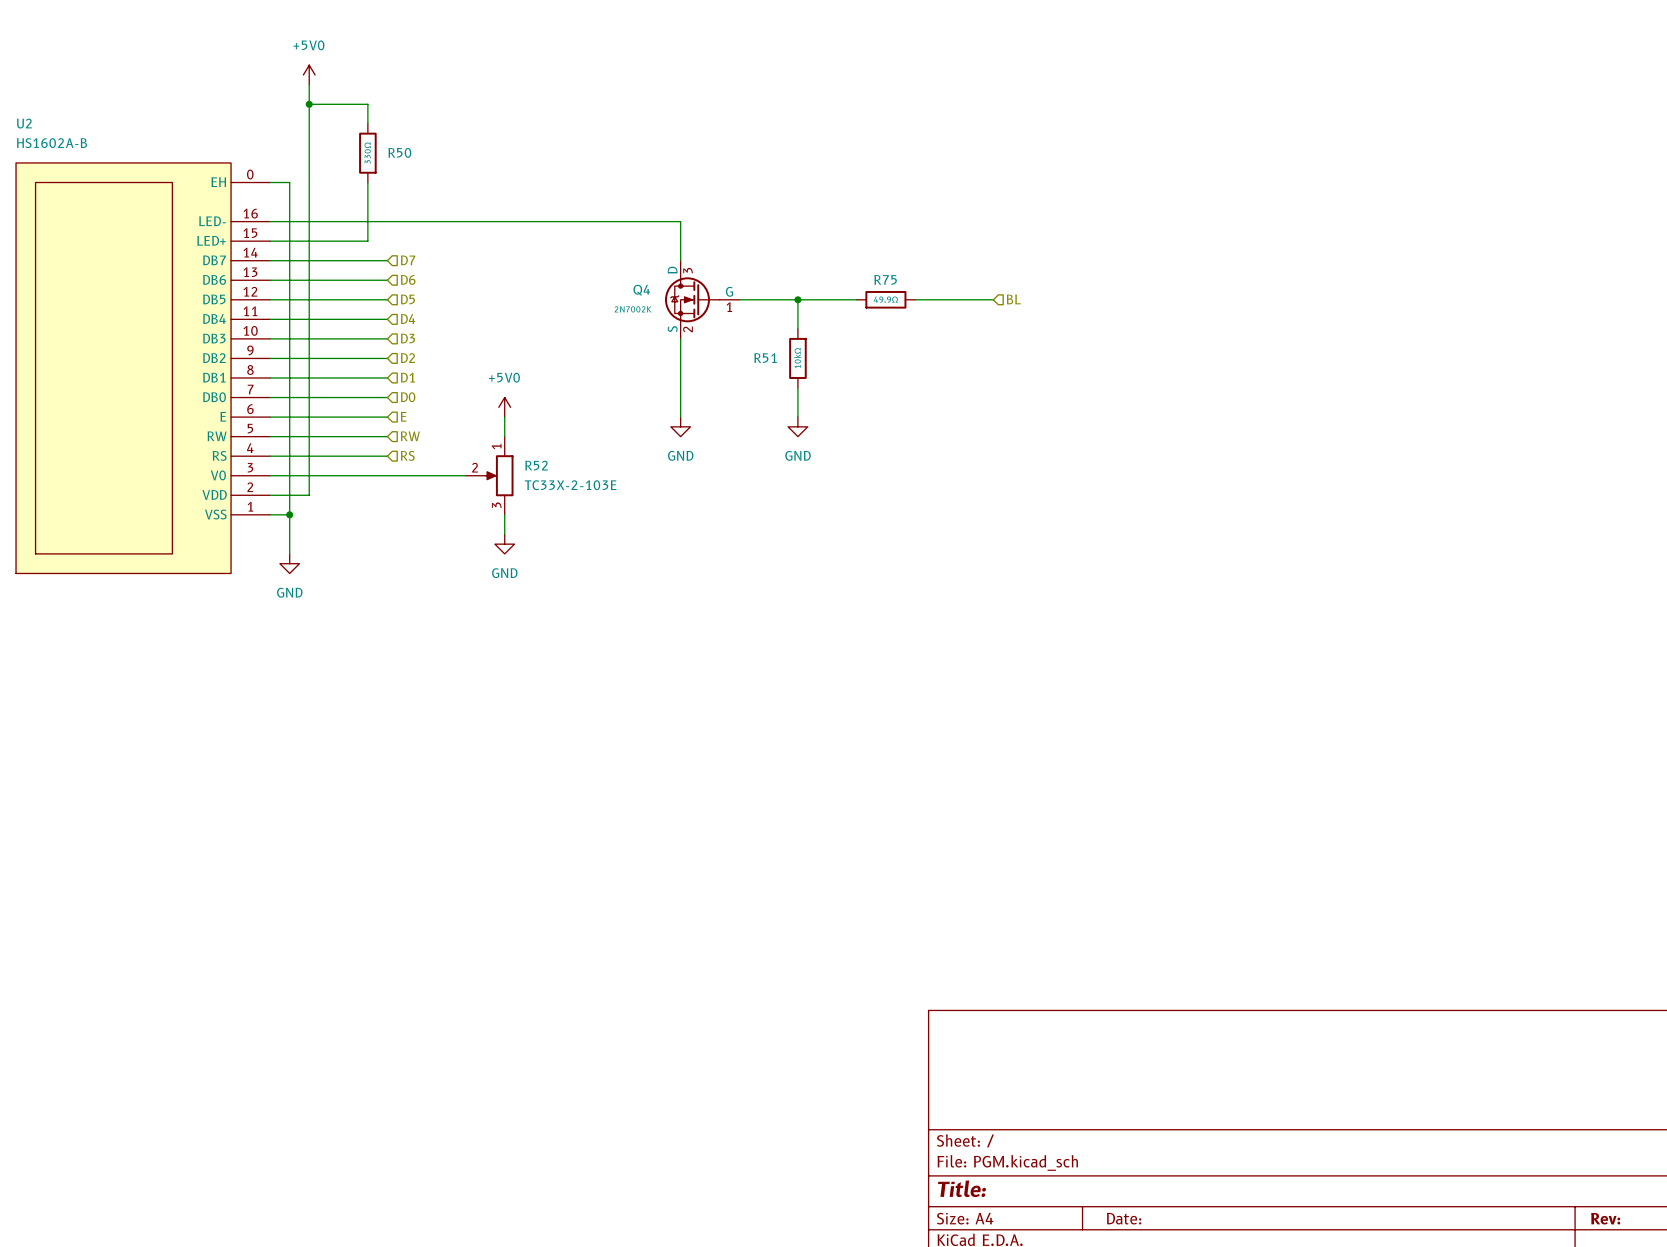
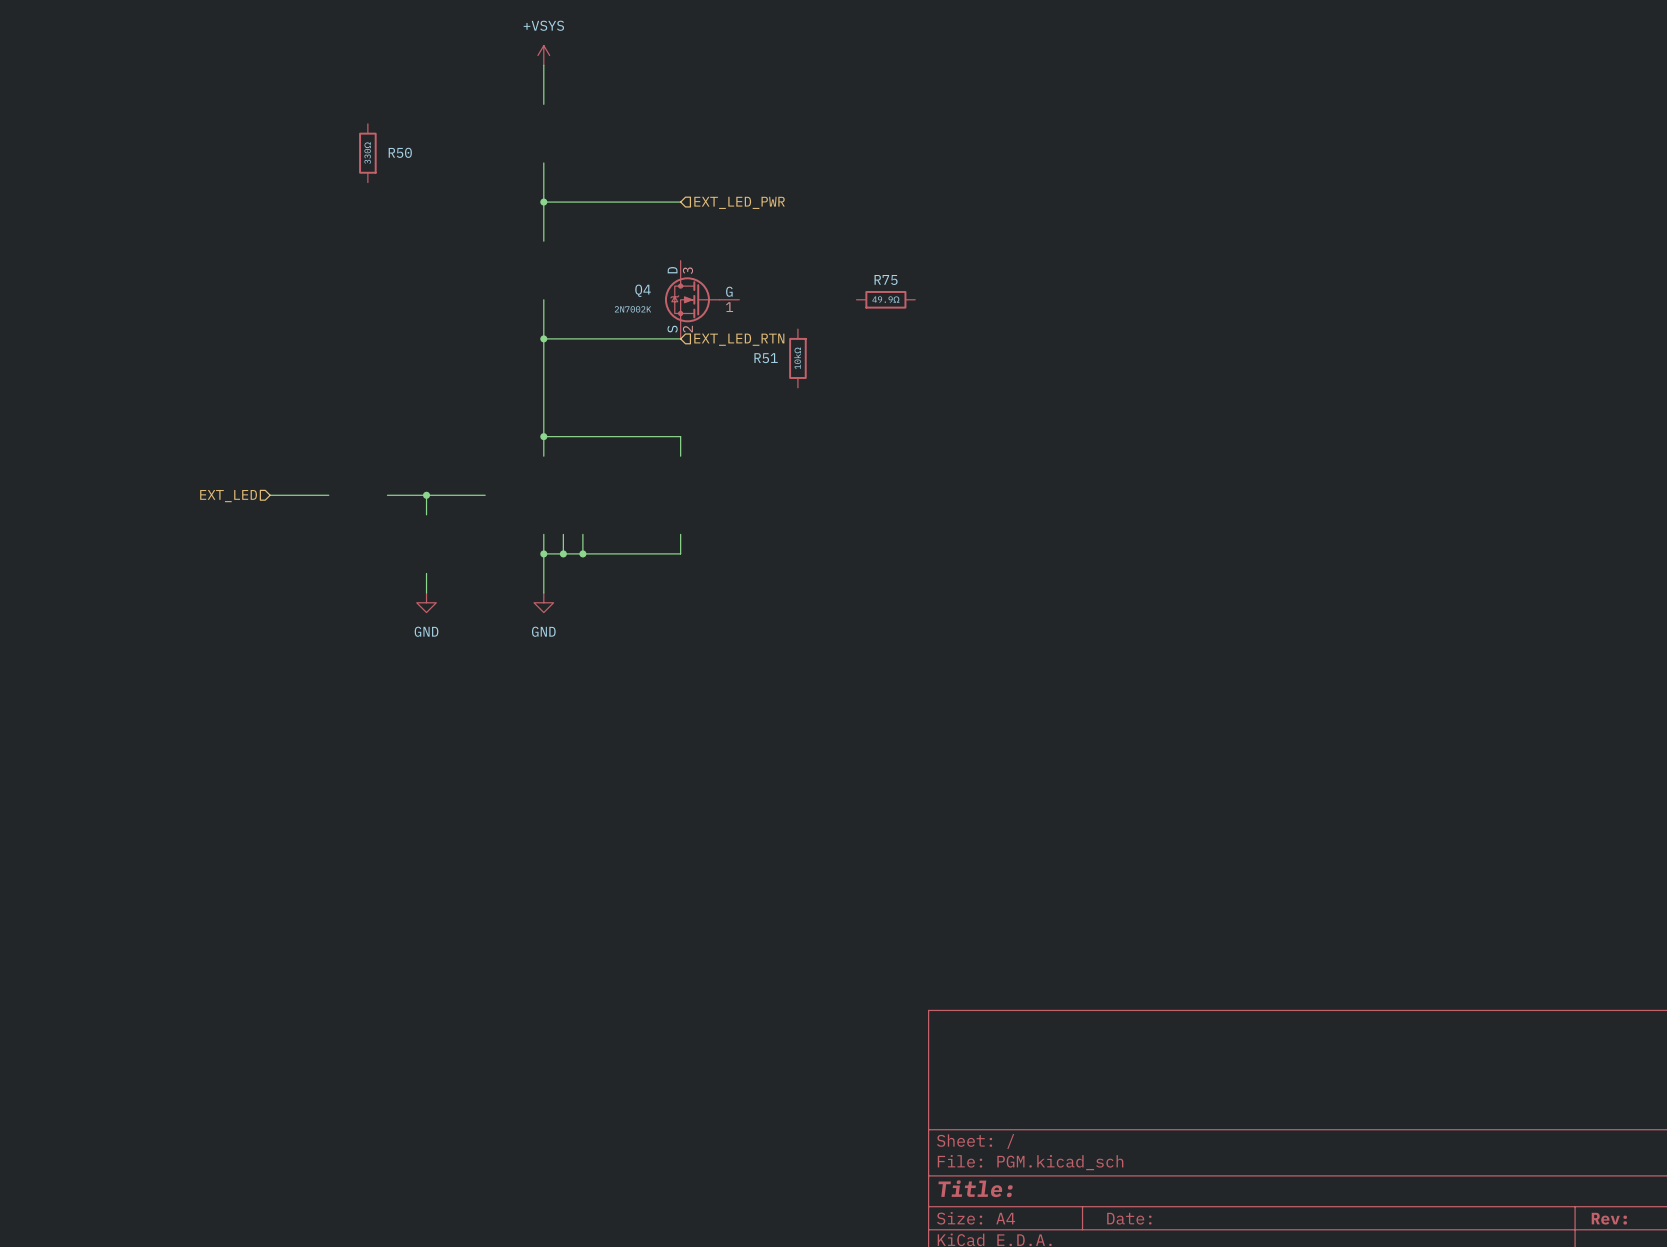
power symbol: none -> +VSYS (543, 55)
wire: none -> (543, 65) (543, 104)
power symbol: +5V0 (309, 75) -> none
wire: (309, 84) (309, 495) -> (328, 495) (309, 495)
wire: (309, 104) (367, 104) (367, 123) -> none
junction: (309, 104) -> none
wire: none -> (543, 162) (543, 241)
wire: (270, 182) (289, 182) (289, 553) -> none
wire: (367, 182) (367, 241) (270, 241) -> none
wire: none -> (543, 202) (680, 202)
junction: none -> (543, 202)
hierarchical label: none -> EXT_LED_PWR (739, 202)
wire: (270, 221) (680, 221) (680, 260) -> none
wire: (270, 260) (387, 260) -> none
hierarchical label: D7 (408, 260) -> none
hierarchical label: D6 (408, 279) -> none
wire: (270, 280) (387, 280) -> none
wire: (270, 299) (387, 299) -> none
hierarchical label: D5 (407, 299) -> none
wire: none -> (543, 299) (543, 456)
wire: (739, 299) (856, 299) -> none
wire: (797, 299) (797, 329) -> none
junction: (797, 299) -> none
wire: (915, 299) (993, 299) -> none
hierarchical label: BL (1013, 299) -> none
hierarchical label: D4 (408, 318) -> none
wire: (270, 319) (387, 319) -> none
wire: (270, 338) (387, 338) -> none
hierarchical label: D3 (407, 338) -> none
junction: none -> (543, 338)
wire: (680, 338) (680, 417) -> (680, 338) (543, 338)
hierarchical label: none -> EXT_LED_RTN (739, 339)
wire: (270, 358) (387, 358) -> none
hierarchical label: D2 (407, 358) -> none
U2: HS1602A-B (143, 368) -> none
wire: (270, 377) (387, 377) -> none
hierarchical label: D1 (407, 377) -> none
wire: (797, 387) (797, 417) -> none
wire: (270, 397) (387, 397) -> none
hierarchical label: D0 (408, 397) -> none
power symbol: +5V0 (504, 407) -> none
hierarchical label: E (403, 416) -> none
wire: (270, 417) (387, 417) -> none
wire: (504, 417) (504, 436) -> (426, 495) (426, 514)
power symbol: GND (680, 426) -> none
power symbol: GND (797, 426) -> none
wire: (270, 436) (387, 436) -> none
hierarchical label: RW (410, 436) -> none
wire: none -> (543, 436) (680, 436) (680, 456)
junction: none -> (543, 436)
hierarchical label: RS (407, 455) -> none
wire: (270, 456) (387, 456) -> none
wire: (270, 475) (465, 475) -> none
R52: TC33X-2-103E (489, 475) -> none
wire: none -> (387, 495) (485, 495)
junction: none -> (426, 495)
hierarchical label: none -> EXT_LED (228, 496)
wire: (270, 514) (289, 514) -> none
junction: (289, 514) -> none
wire: (504, 514) (504, 534) -> (563, 534) (563, 553)
wire: none -> (543, 534) (543, 593)
wire: none -> (582, 534) (582, 553)
wire: none -> (680, 534) (680, 553) (543, 553)
power symbol: GND (504, 544) -> none
junction: none -> (543, 553)
junction: none -> (563, 553)
junction: none -> (582, 553)
power symbol: GND (289, 563) -> none
wire: none -> (426, 573) (426, 593)
power symbol: none -> GND (426, 602)
power symbol: none -> GND (543, 602)

